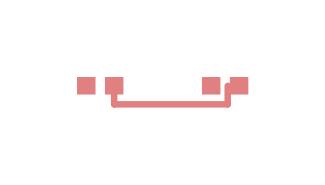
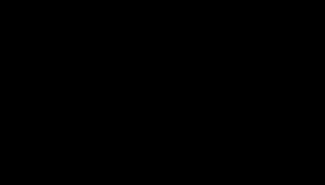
part: (100, 85) -> none
part: (225, 85) -> none
top track: (227, 85) (227, 104) (114, 104) (114, 85) -> none

